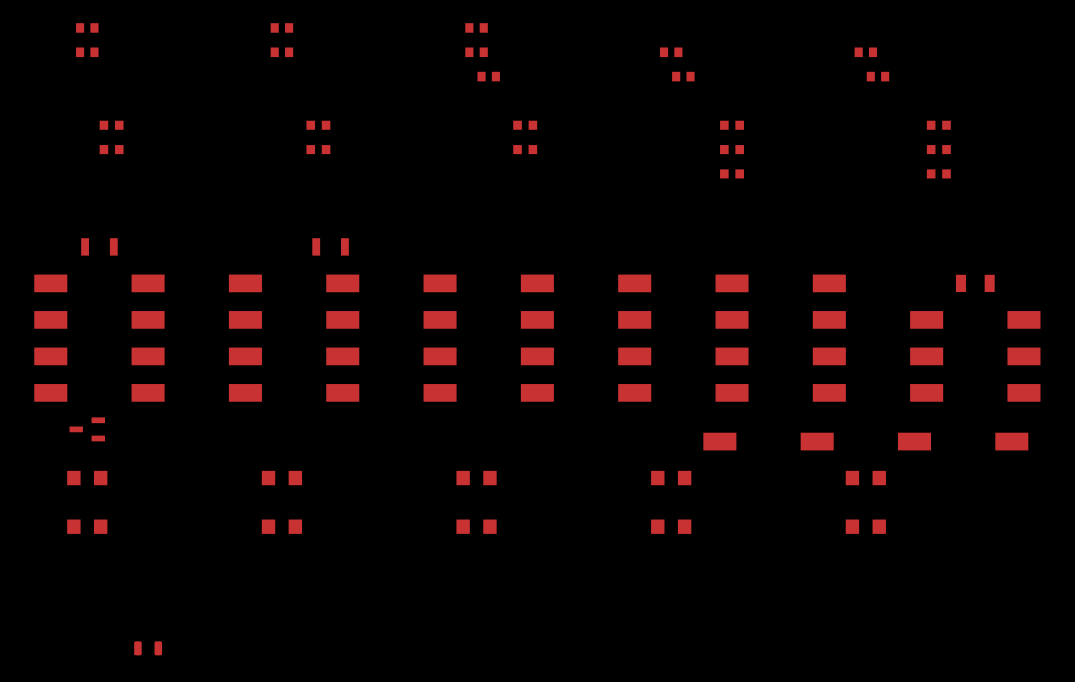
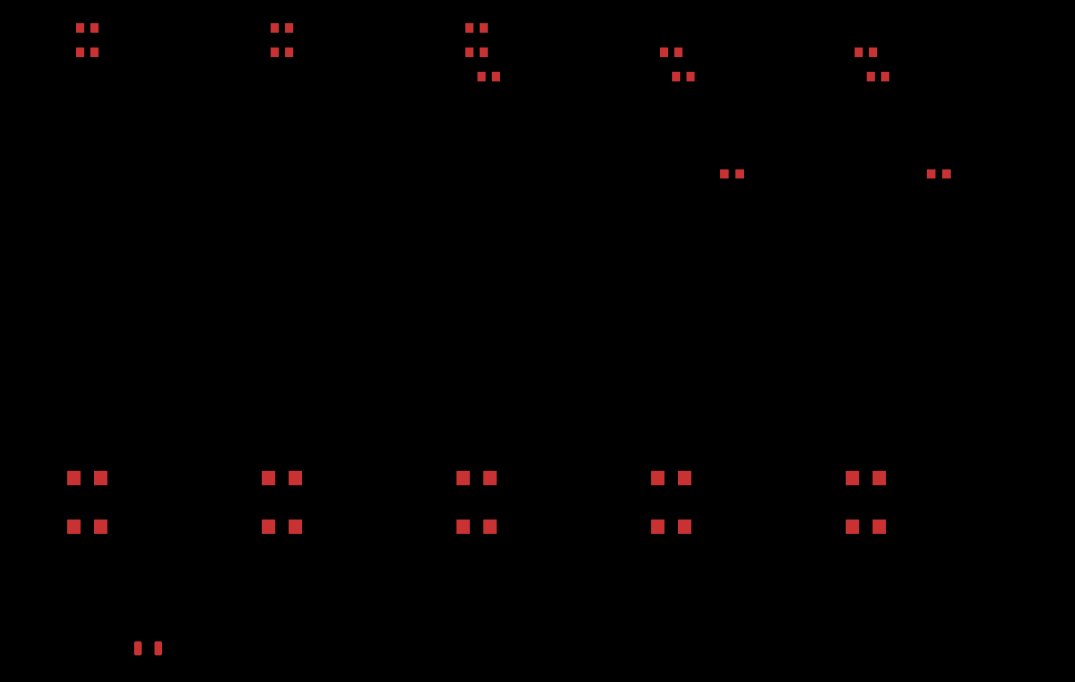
part: (111, 125) -> none
part: (318, 125) -> none
part: (525, 125) -> none
part: (732, 125) -> none
part: (938, 125) -> none
part: (111, 149) -> none
part: (318, 149) -> none
part: (525, 149) -> none
part: (732, 149) -> none
part: (938, 149) -> none
part: (99, 246) -> none
part: (330, 246) -> none
part: (50, 283) -> none
part: (148, 283) -> none
part: (245, 283) -> none
part: (342, 283) -> none
part: (440, 283) -> none
part: (537, 283) -> none
part: (634, 283) -> none
part: (732, 283) -> none
part: (829, 283) -> none
part: (975, 283) -> none
part: (50, 319) -> none
part: (148, 319) -> none
part: (245, 319) -> none
part: (342, 319) -> none
part: (440, 319) -> none
part: (537, 319) -> none
part: (634, 319) -> none
part: (732, 319) -> none
part: (829, 319) -> none
part: (926, 319) -> none
part: (1023, 319) -> none
part: (50, 356) -> none
part: (148, 356) -> none
part: (245, 356) -> none
part: (342, 356) -> none
part: (440, 356) -> none
part: (537, 356) -> none
part: (634, 356) -> none
part: (732, 356) -> none
part: (829, 356) -> none
part: (926, 356) -> none
part: (1023, 356) -> none
part: (50, 392) -> none
part: (148, 392) -> none
part: (245, 392) -> none
part: (342, 392) -> none
part: (440, 392) -> none
part: (537, 392) -> none
part: (634, 392) -> none
part: (732, 392) -> none
part: (829, 392) -> none
part: (926, 392) -> none
part: (1023, 392) -> none
part: (87, 429) -> none
part: (719, 441) -> none
part: (817, 441) -> none
part: (914, 441) -> none
part: (1011, 441) -> none

